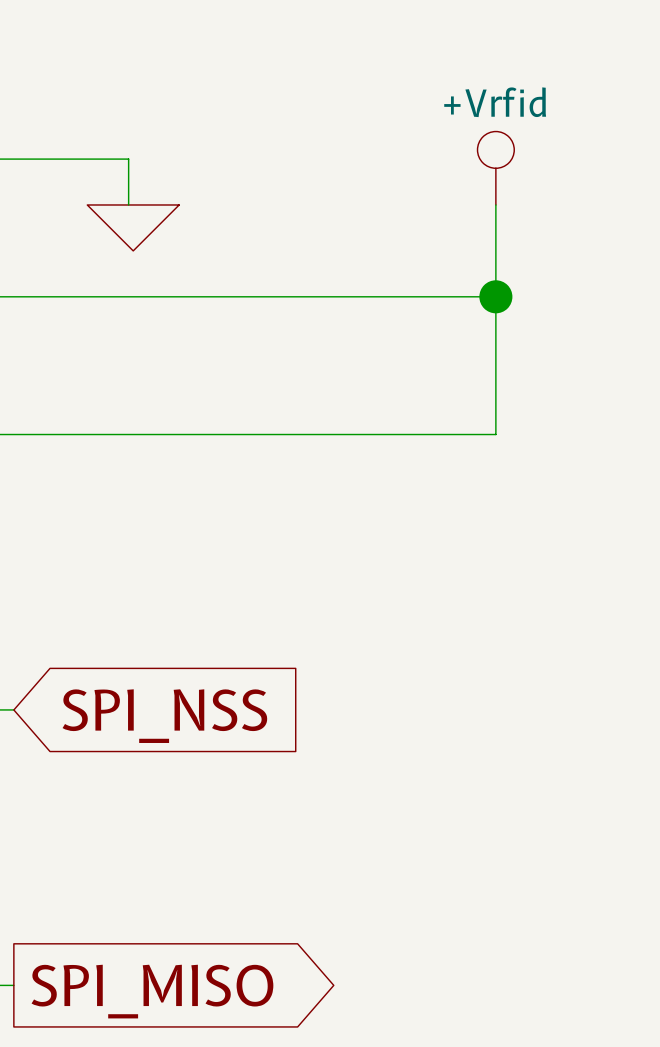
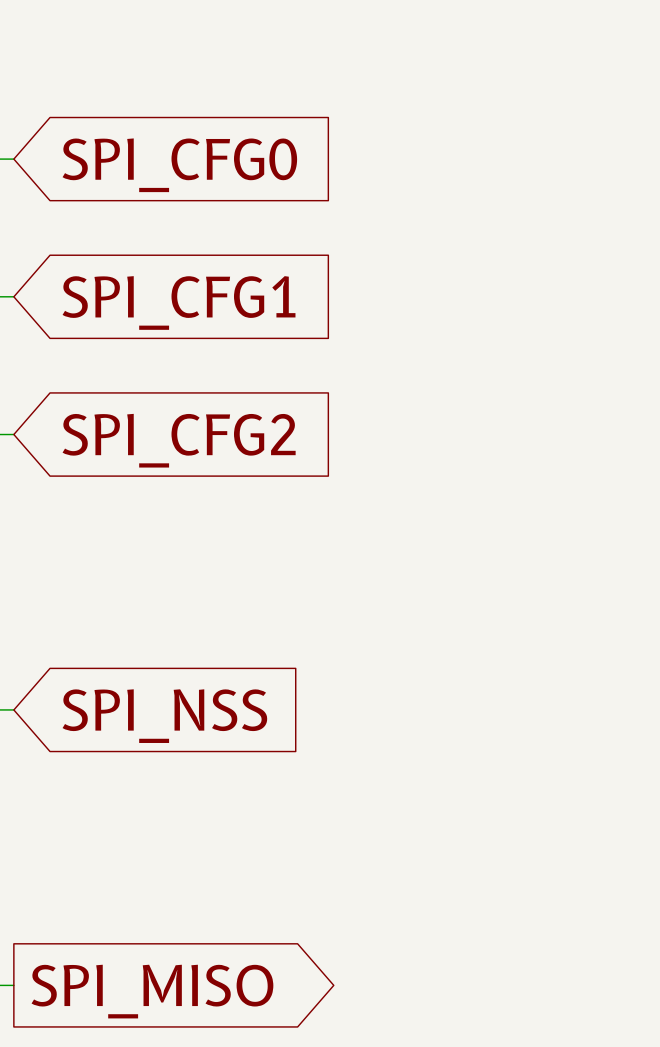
wire: (13, 159) (128, 159) (128, 204) -> none
global label: none -> SPI_CFG0 (179, 165)
power symbol: +Vrfid (495, 168) -> none
wire: (495, 204) (495, 434) (13, 434) -> none
power symbol: (133, 227) -> none
wire: (13, 296) (495, 296) -> none
junction: (495, 296) -> none
global label: none -> SPI_CFG1 (179, 302)
global label: none -> SPI_CFG2 (179, 440)

